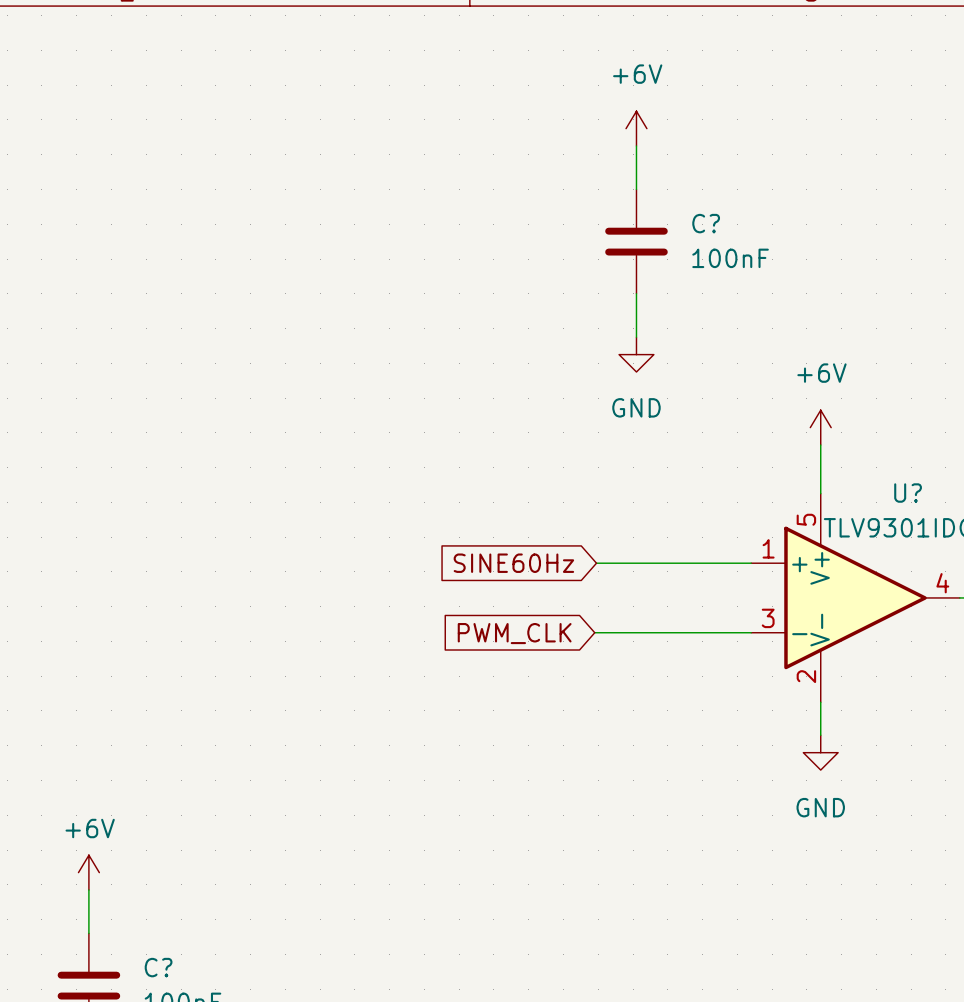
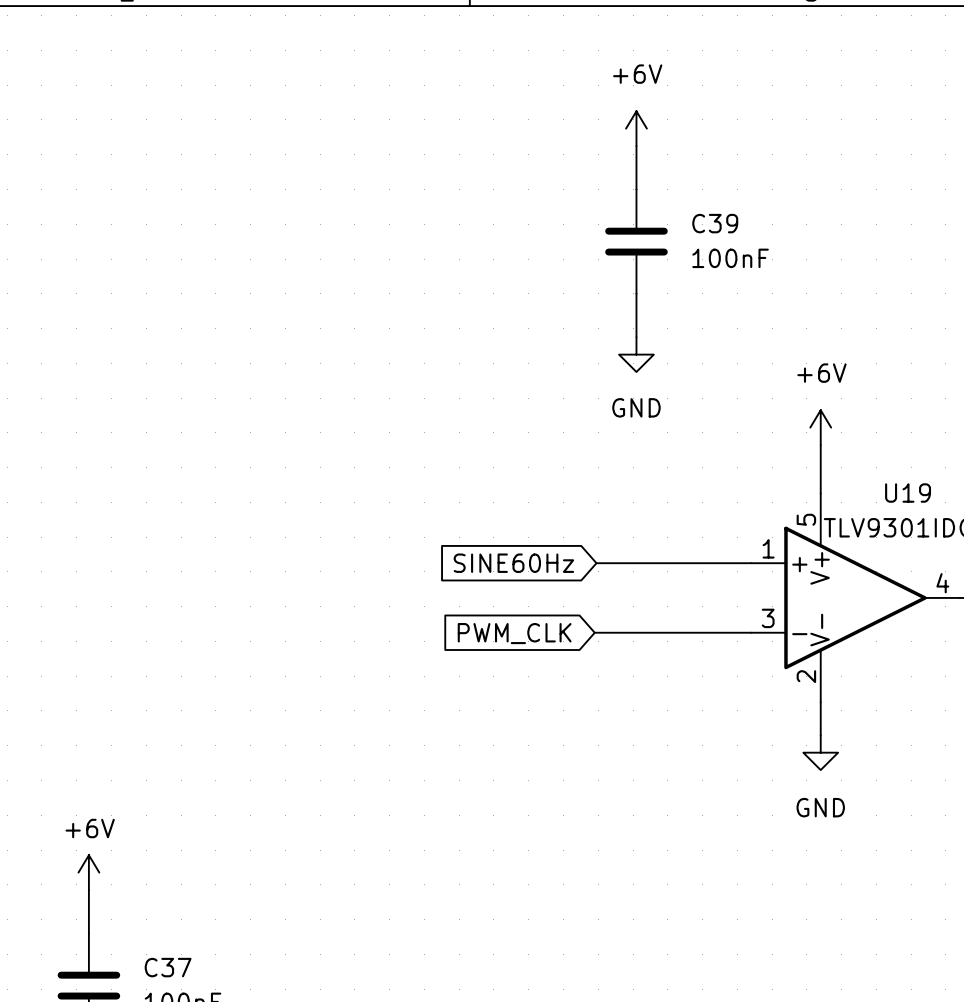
C? name: C? (706, 223) -> C39 (715, 223)
U? name: U? (908, 493) -> U19 (908, 493)
C? name: C? (158, 967) -> C37 (168, 967)

